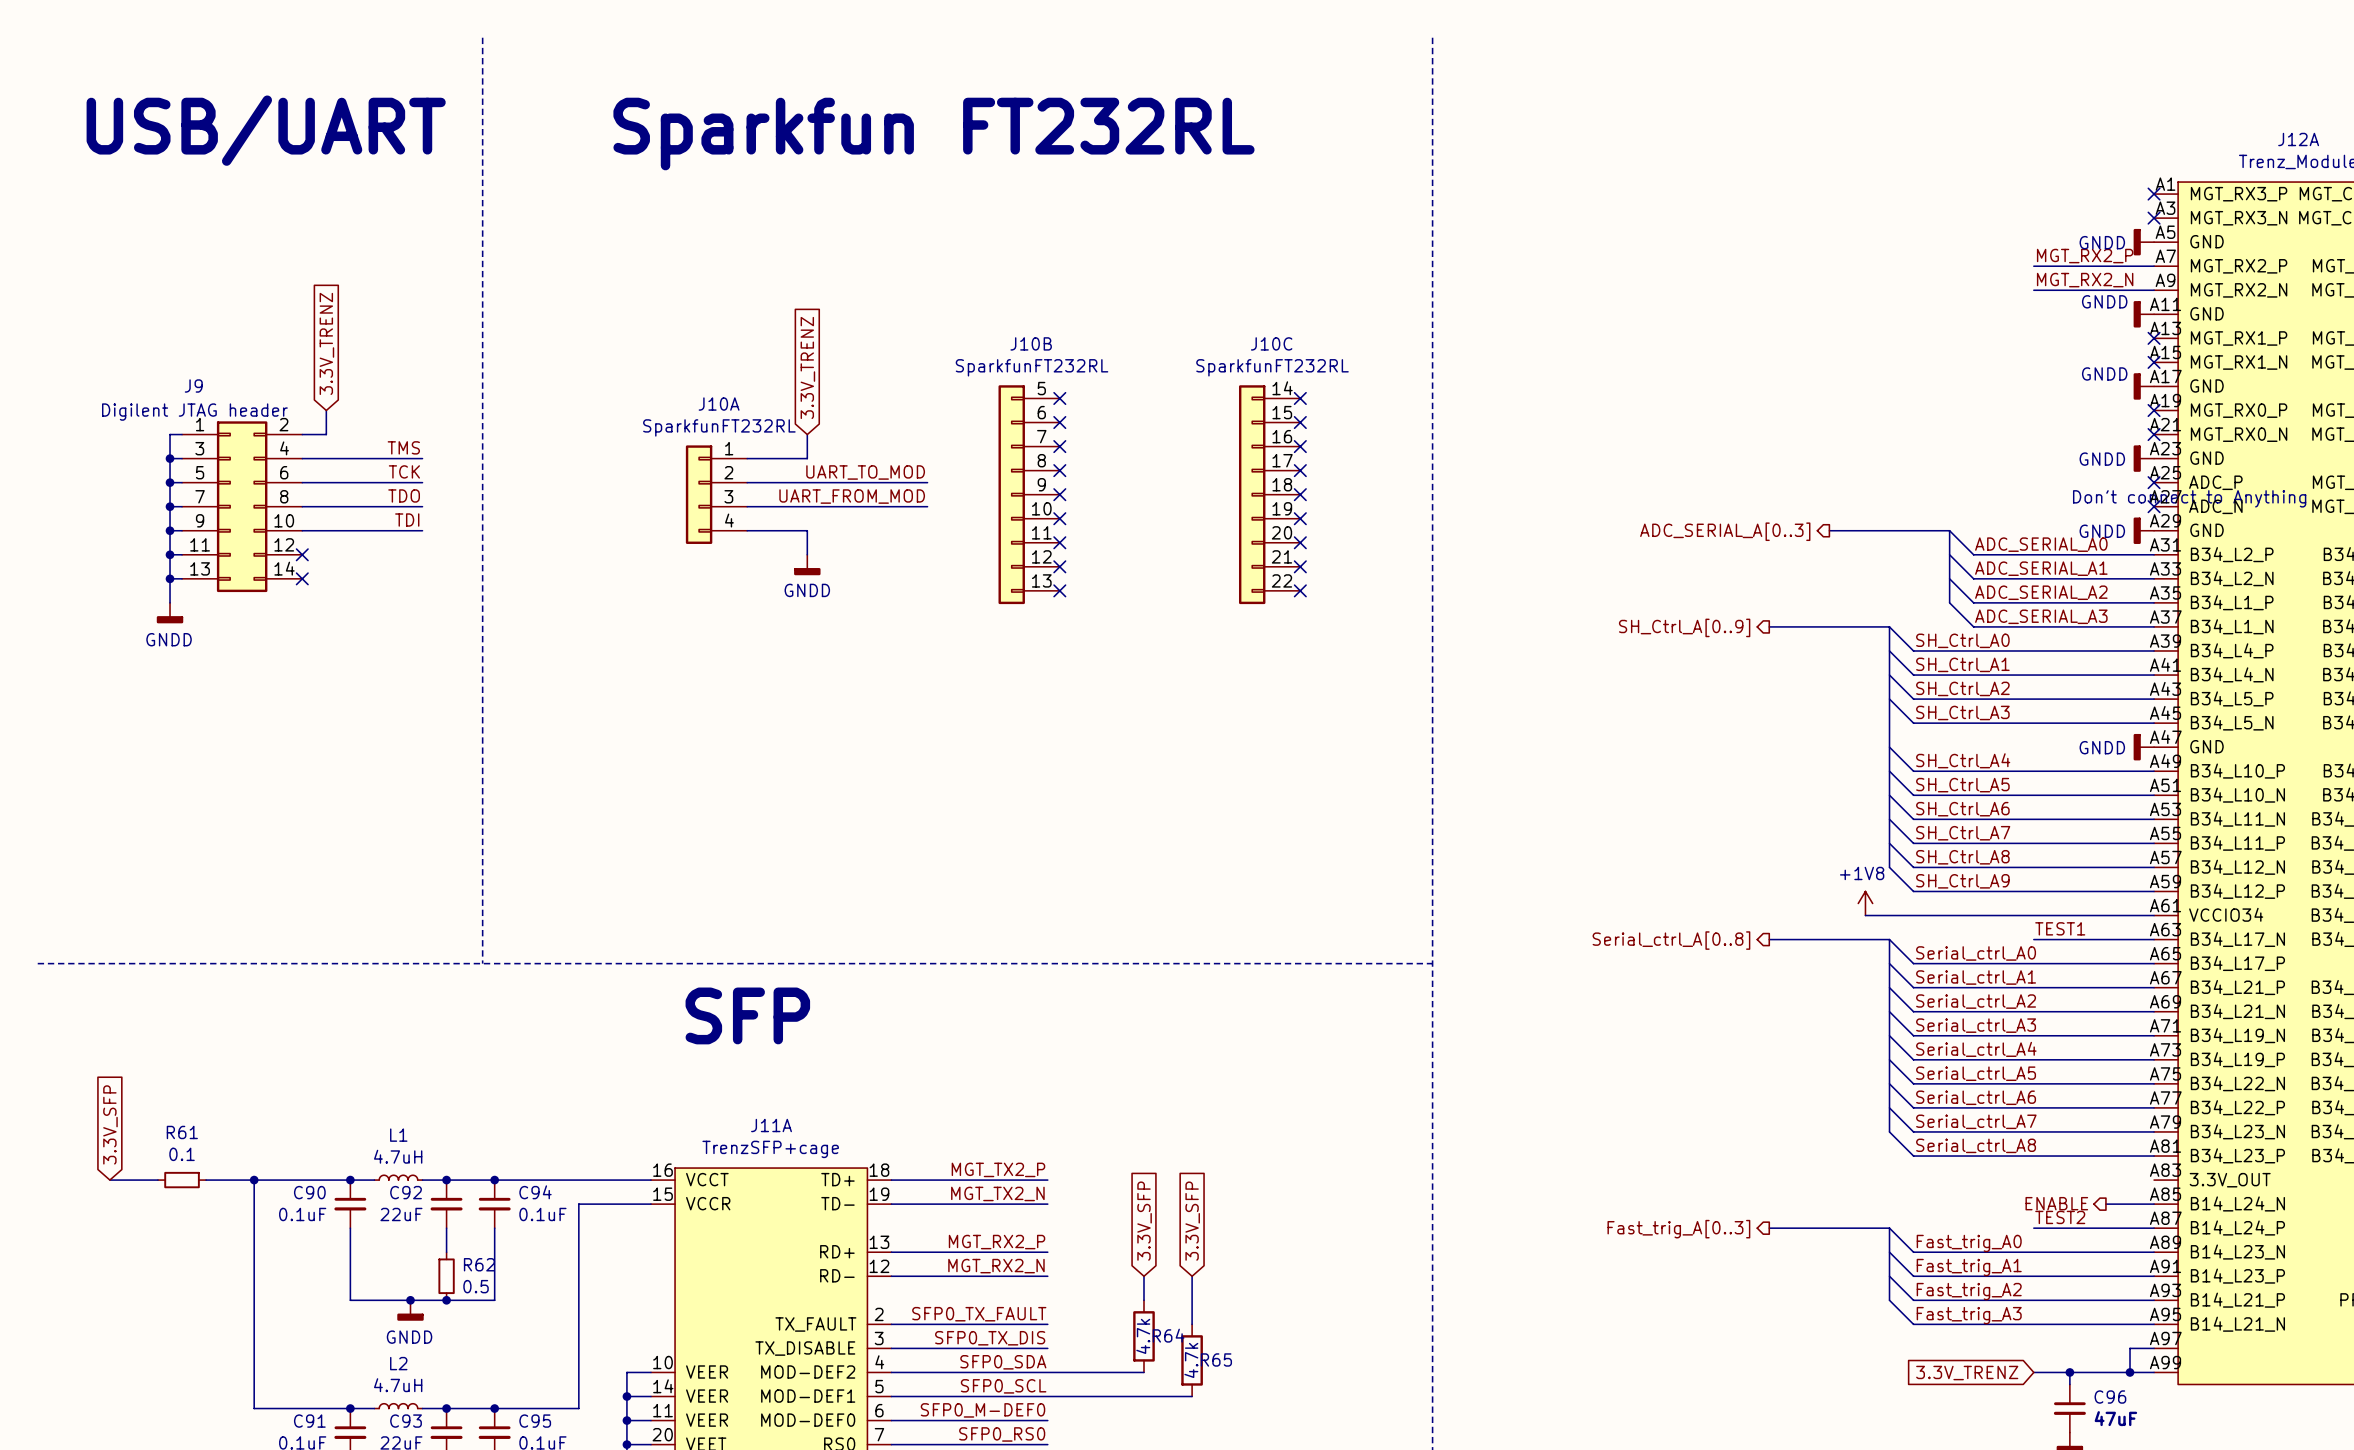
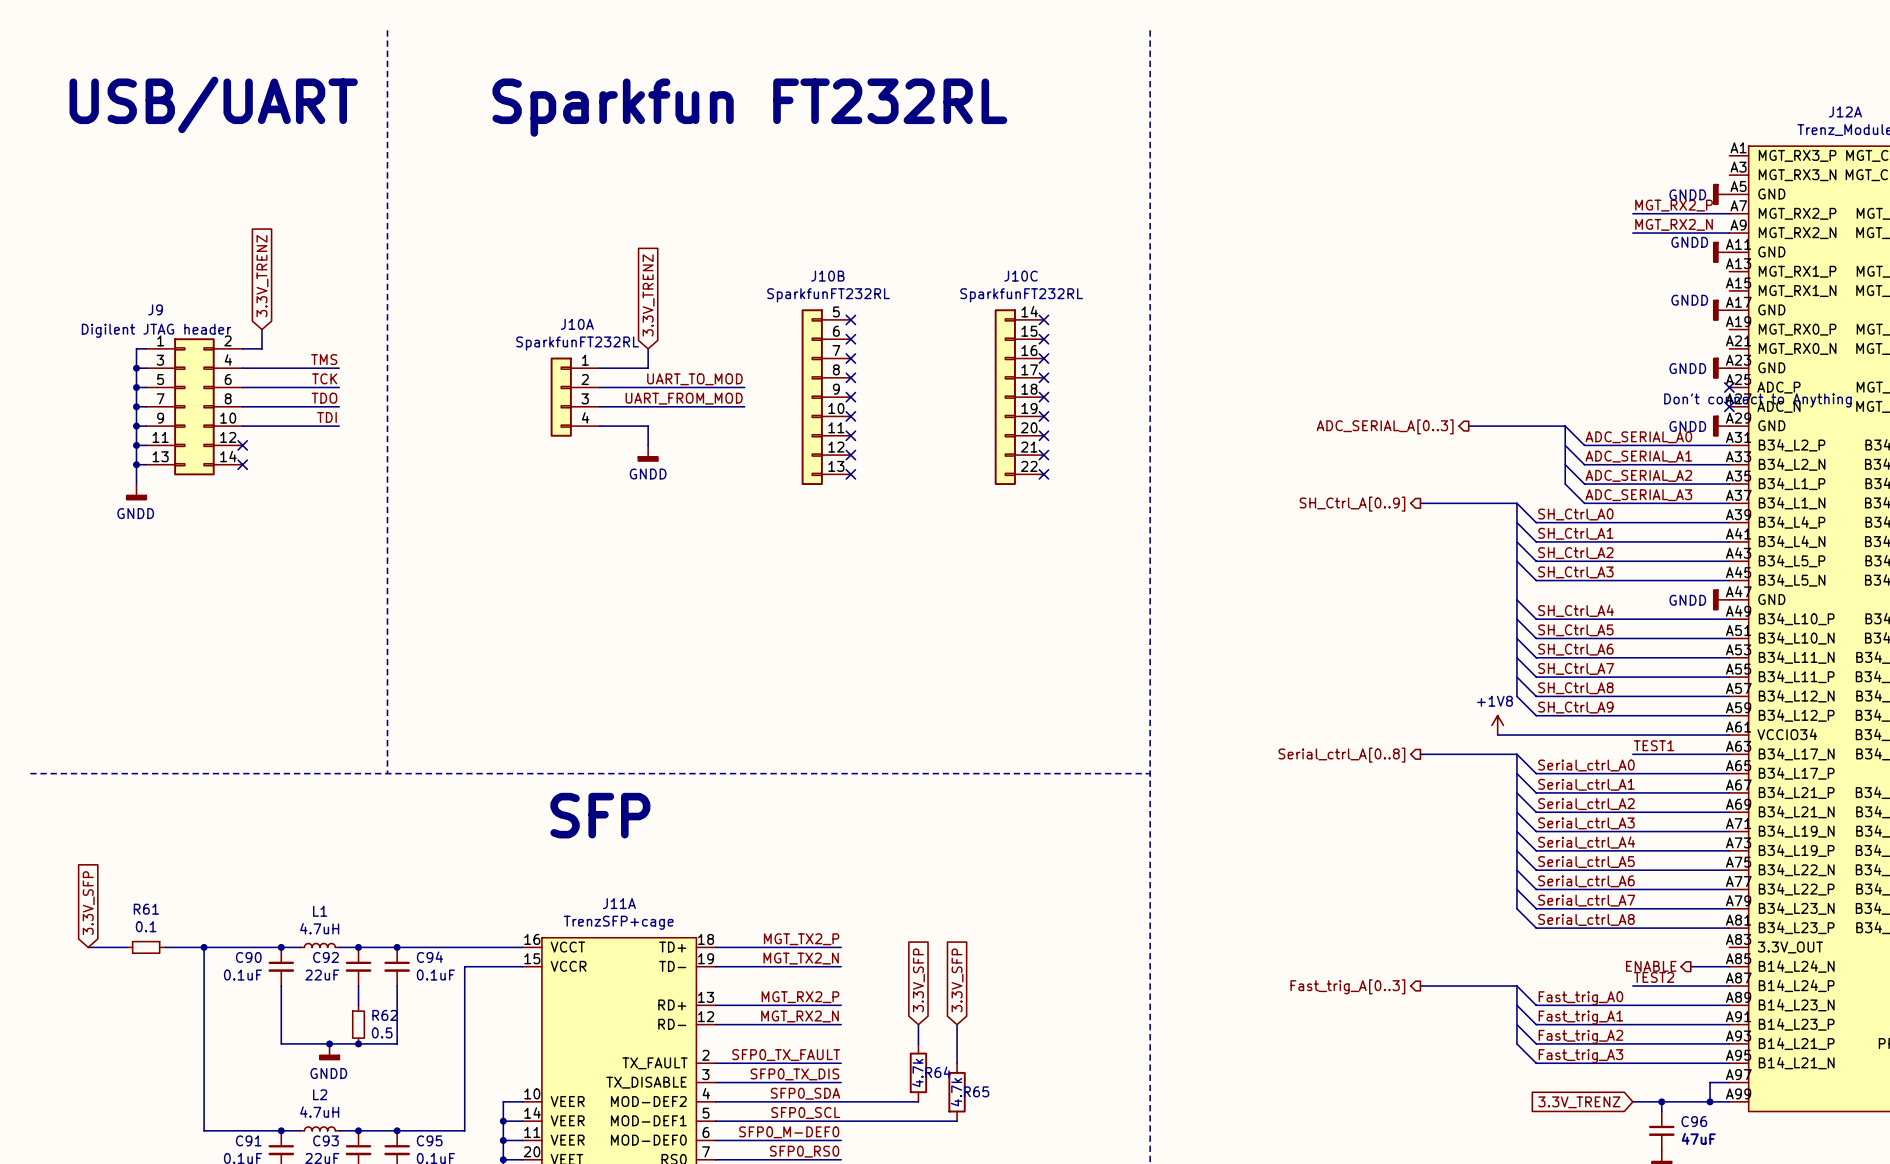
no-connect mark: (2154, 194) -> none
no-connect mark: (2154, 218) -> none
no-connect mark: (2154, 338) -> none
no-connect mark: (2154, 362) -> none
no-connect mark: (2154, 410) -> none
no-connect mark: (2154, 434) -> none

